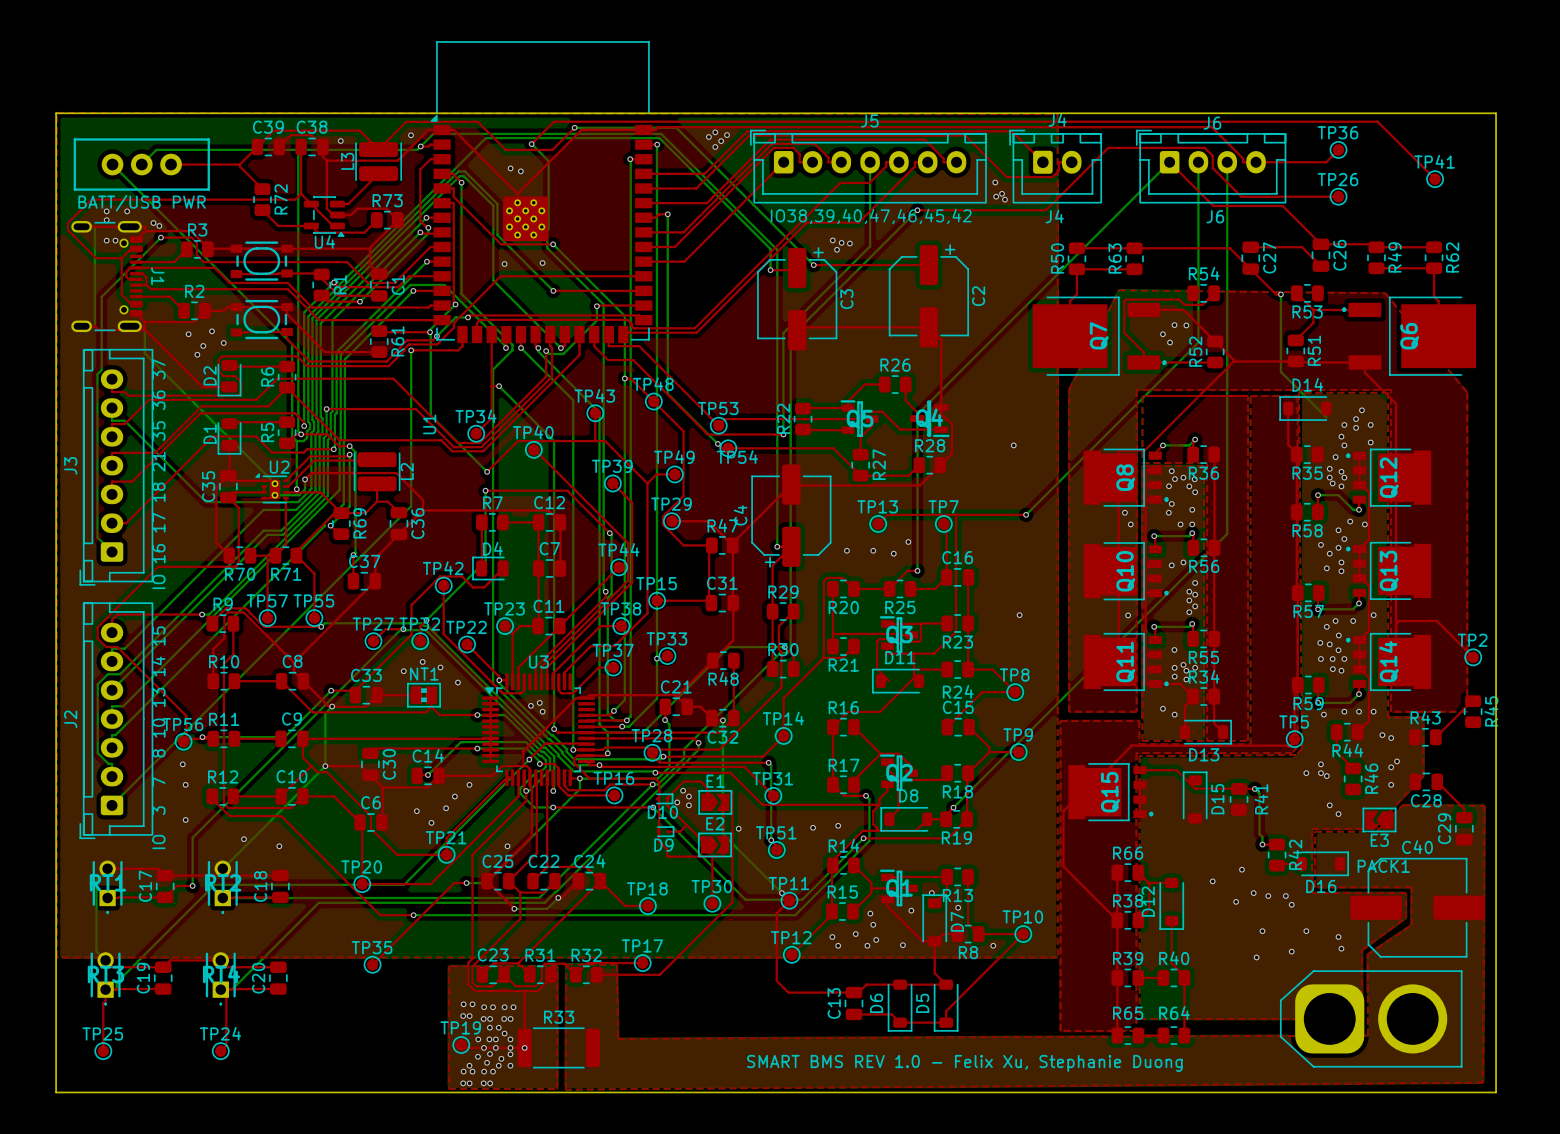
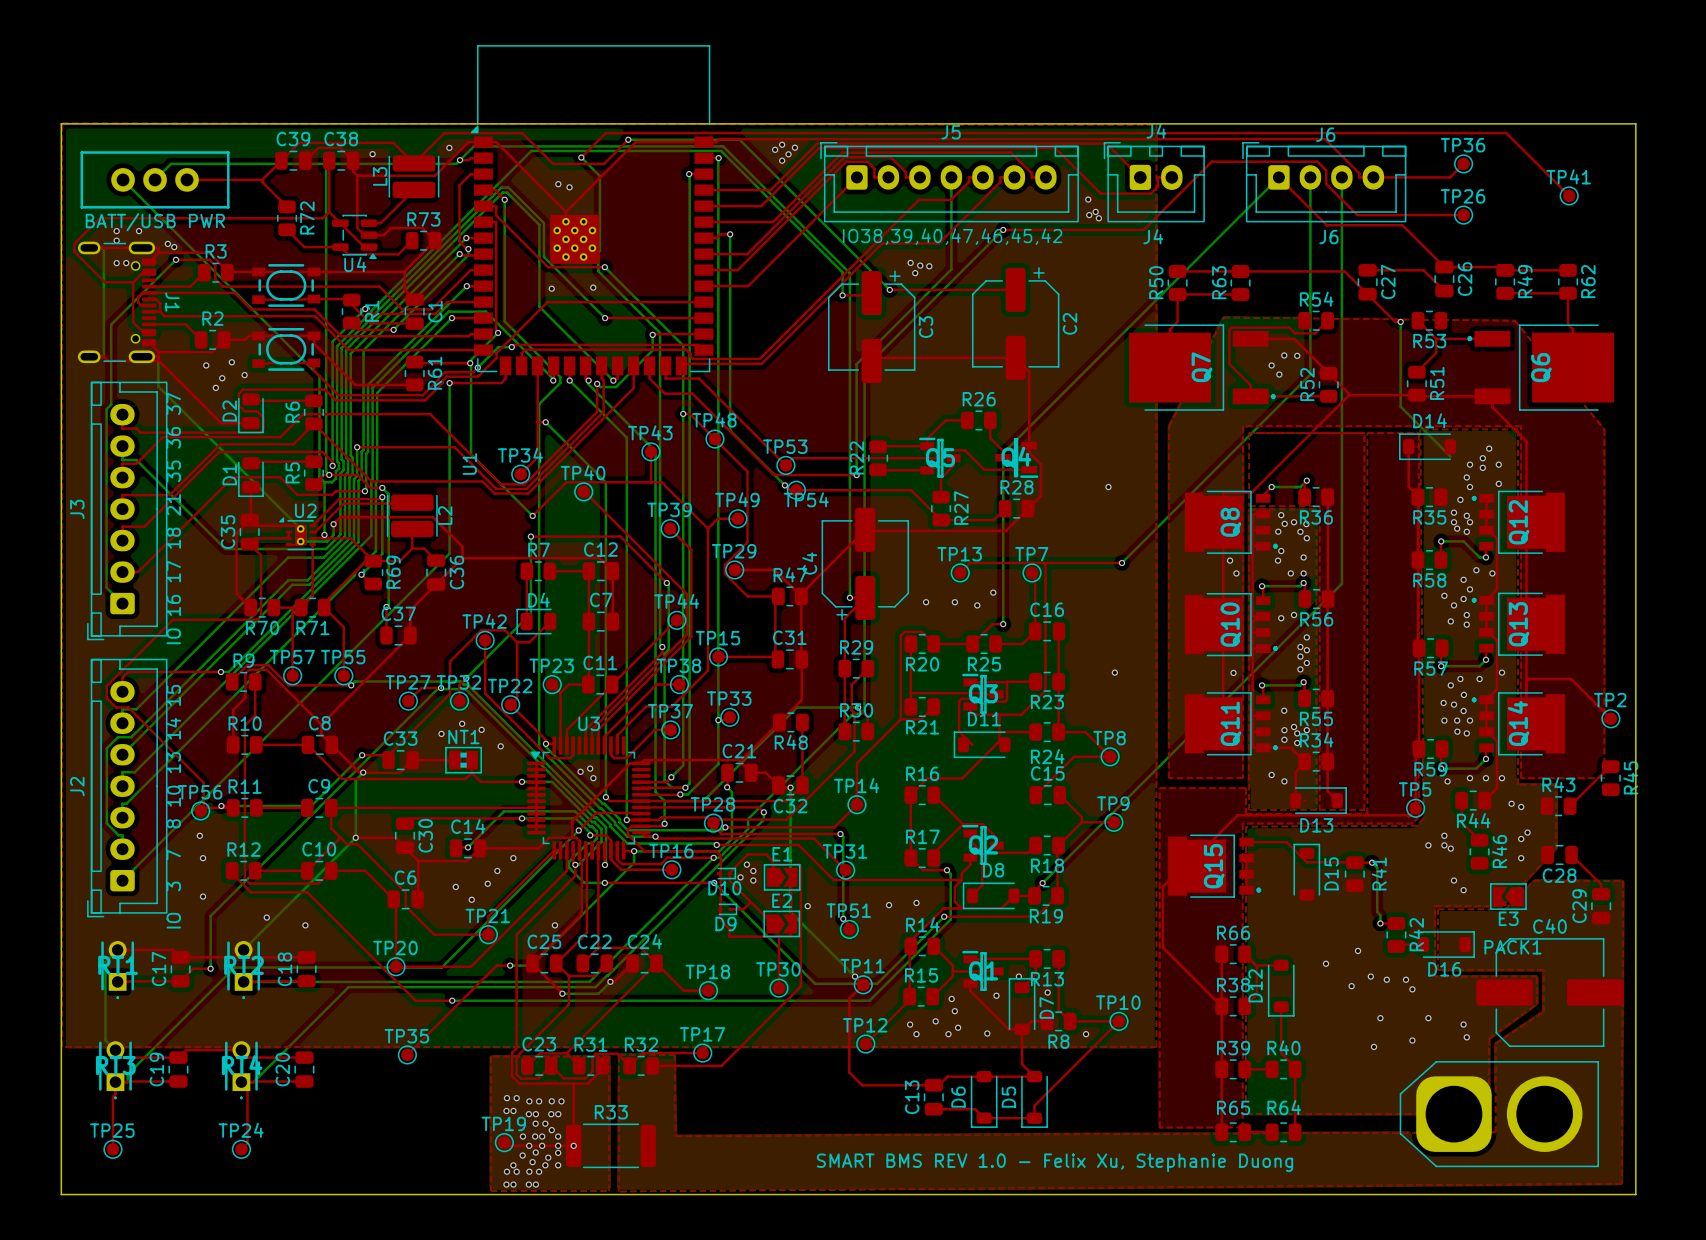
top track: none -> (517, 642) (517, 698) (510, 704)

